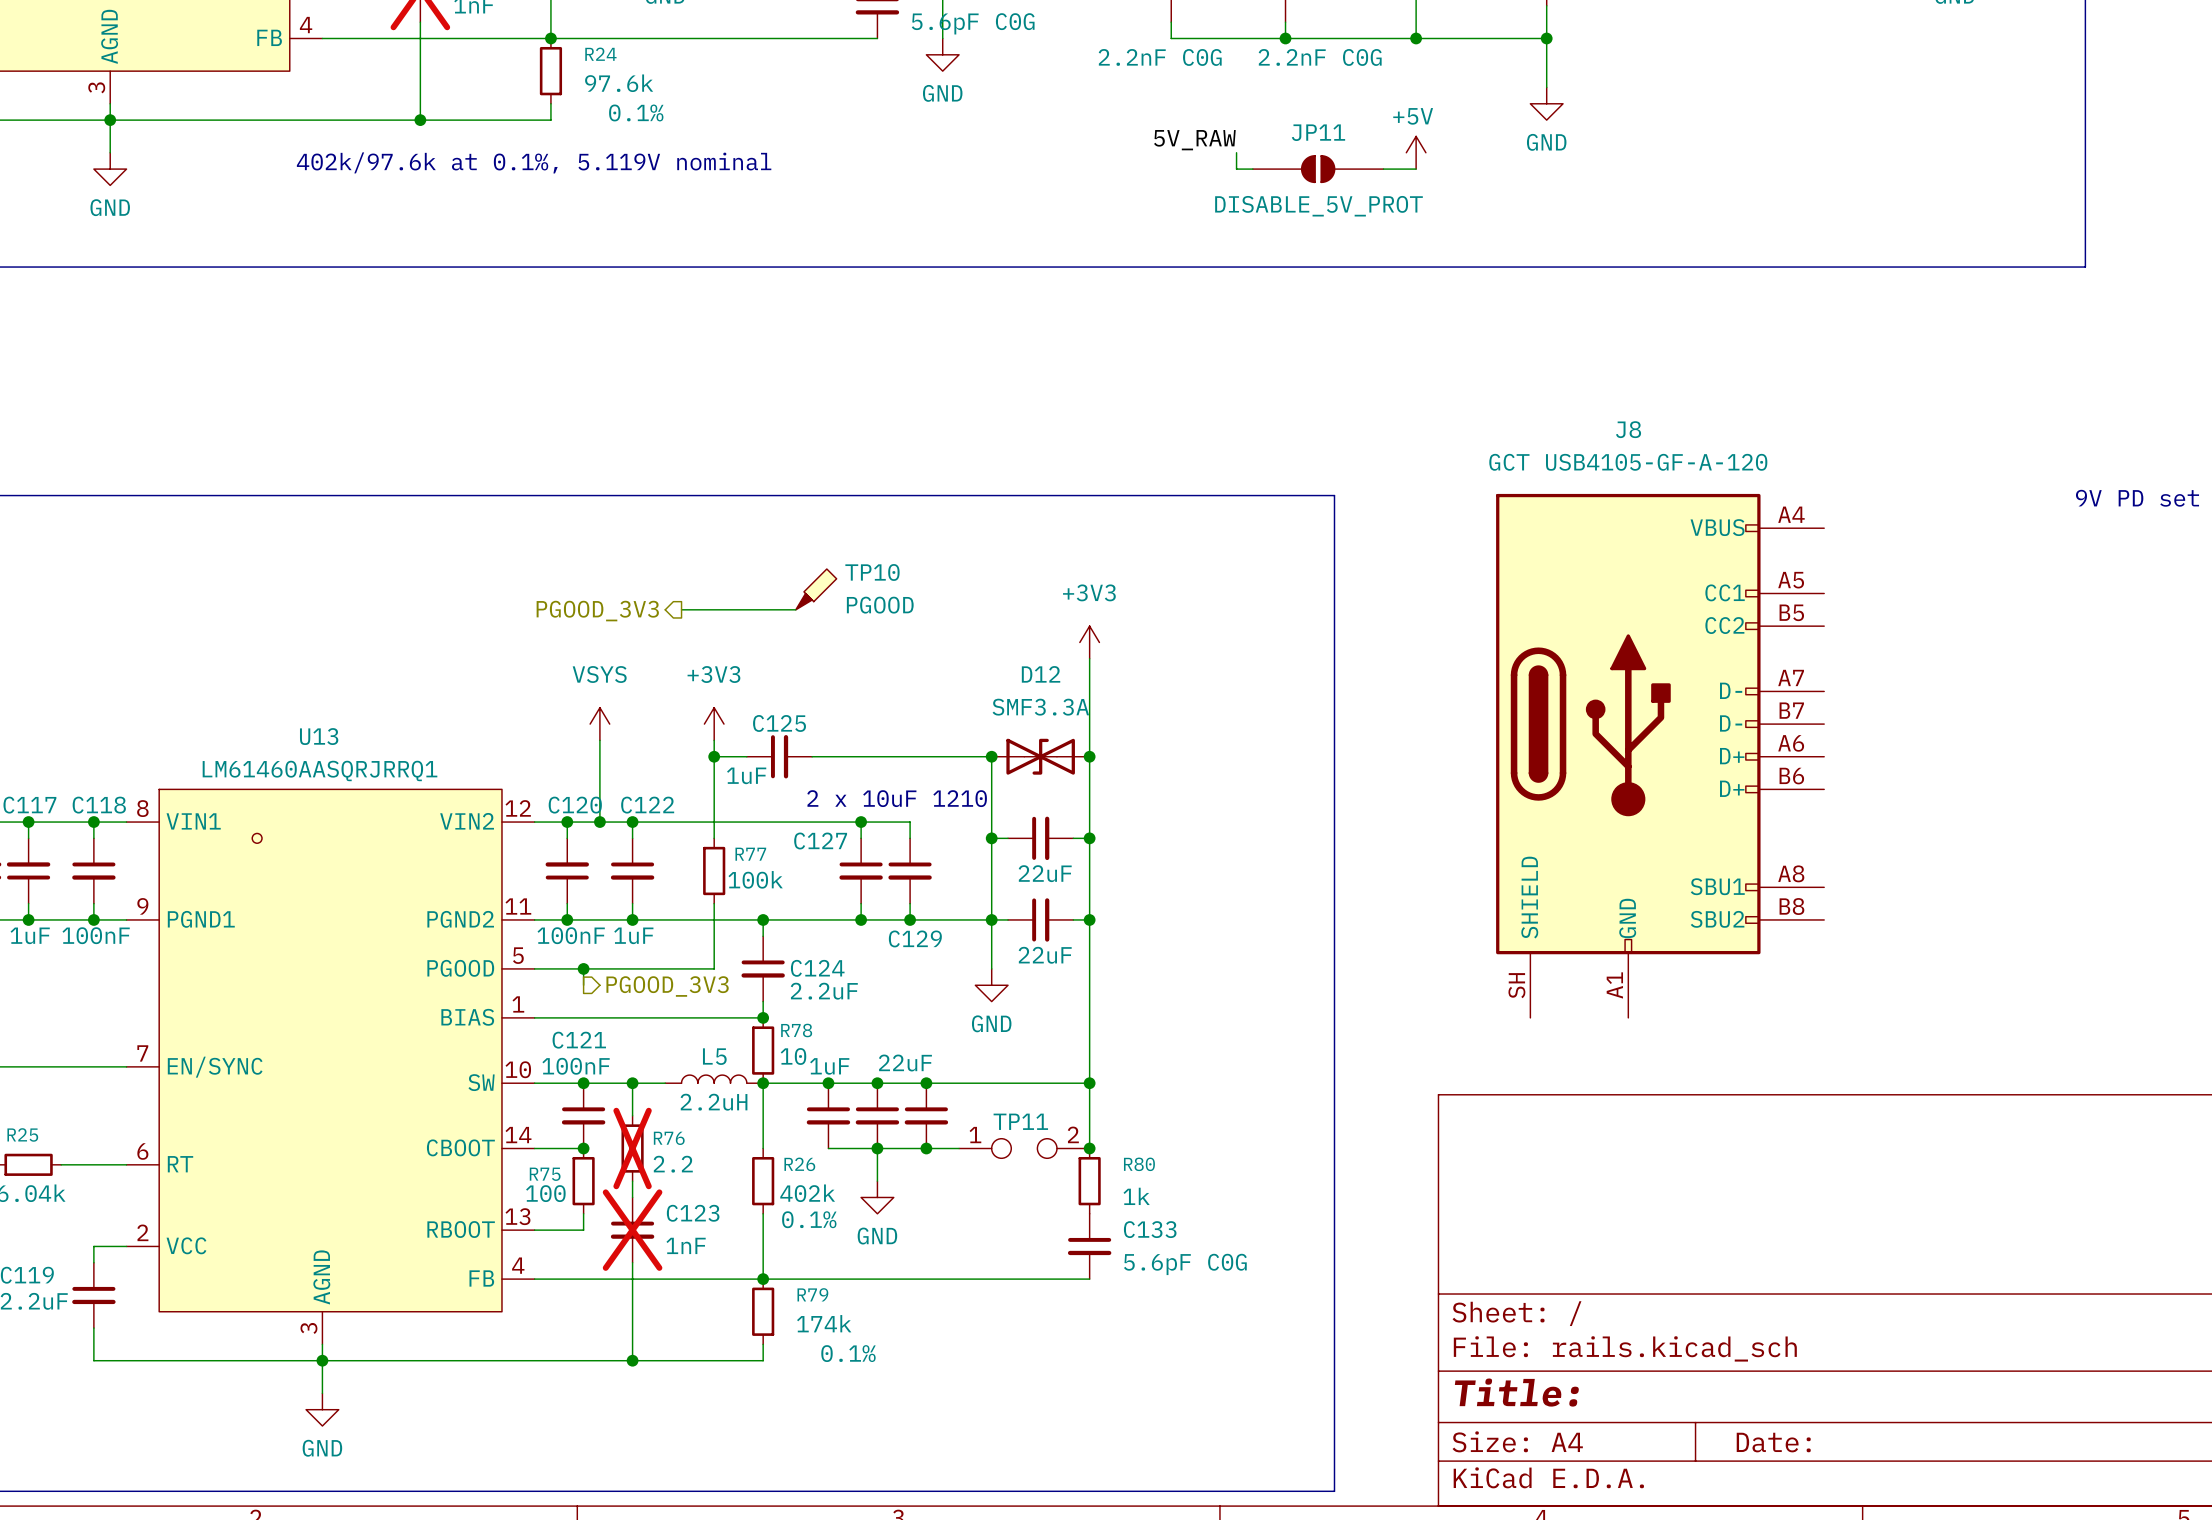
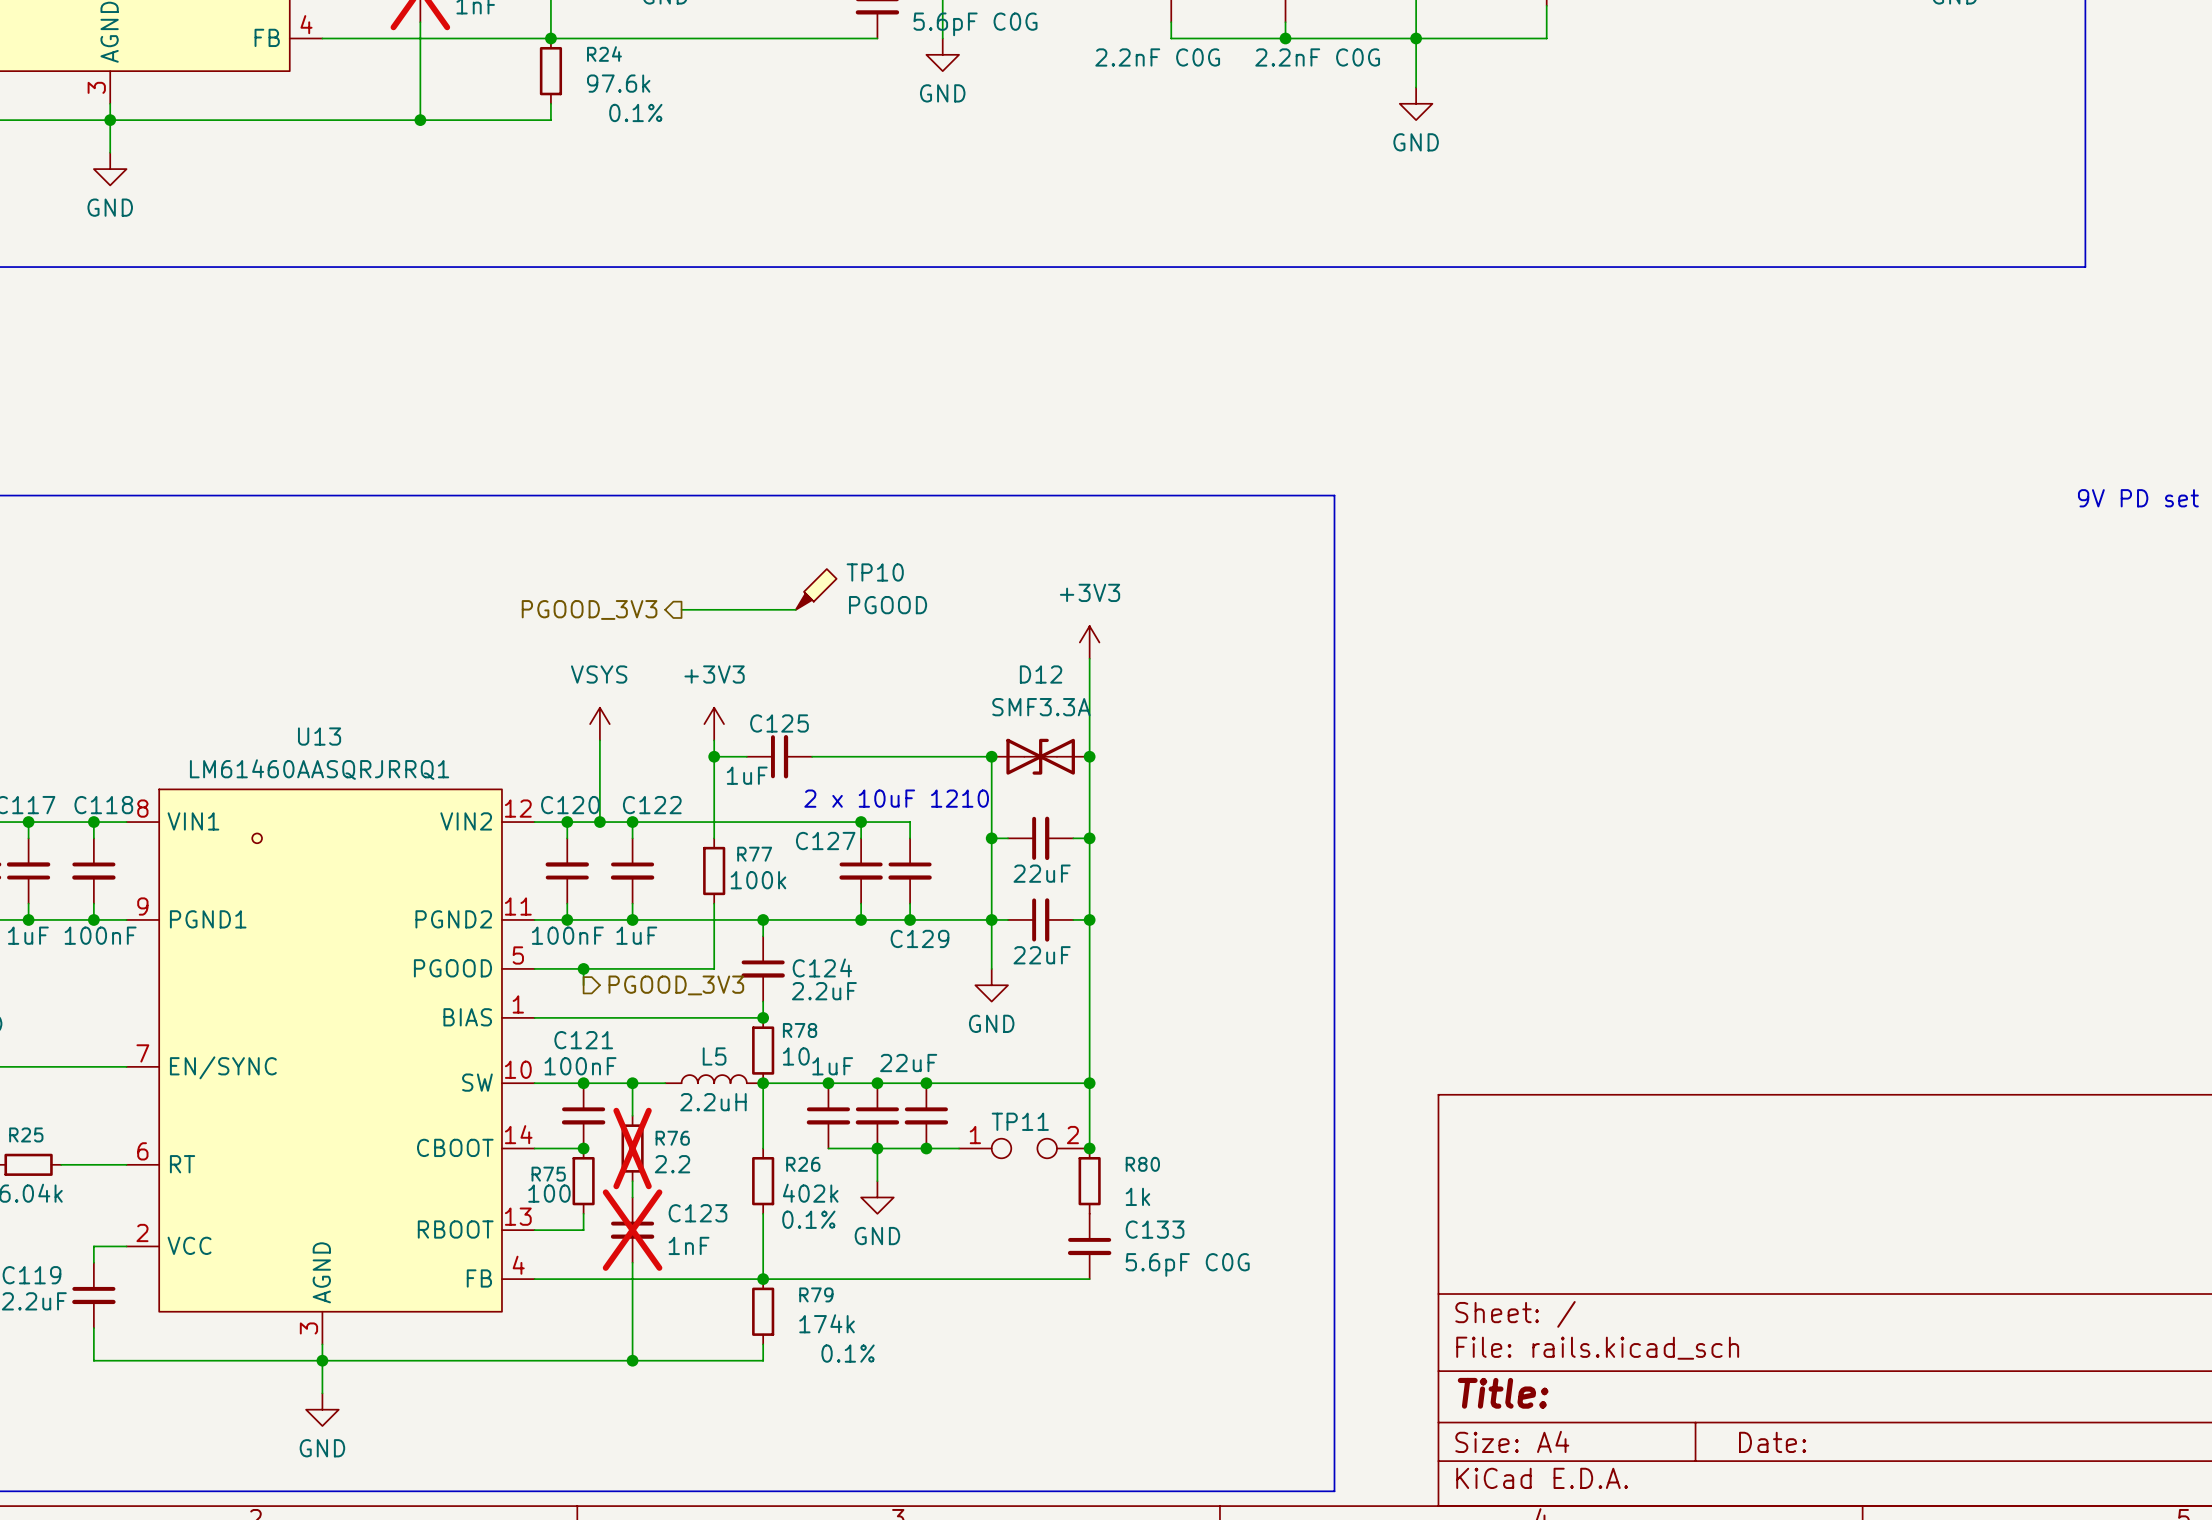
wire: (1546, 38) (1546, 87) -> (1416, 38) (1416, 87)
junction: (1546, 38) -> none
power symbol position: GND (1546, 103) -> GND (1416, 103)
label: 5V_RAW (1194, 140) -> none
wire: (1236, 152) (1236, 169) (1252, 169) -> none
power symbol: +5V (1416, 152) -> none
text: 402k/97.6k at 0.1%, 5.119V nominal (534, 162) -> none
JP11: DISABLE_5V_PROT (1318, 169) -> none
wire: (1383, 169) (1416, 169) -> none
J8: GCT USB4105-GF-A-120 (1660, 755) -> none

